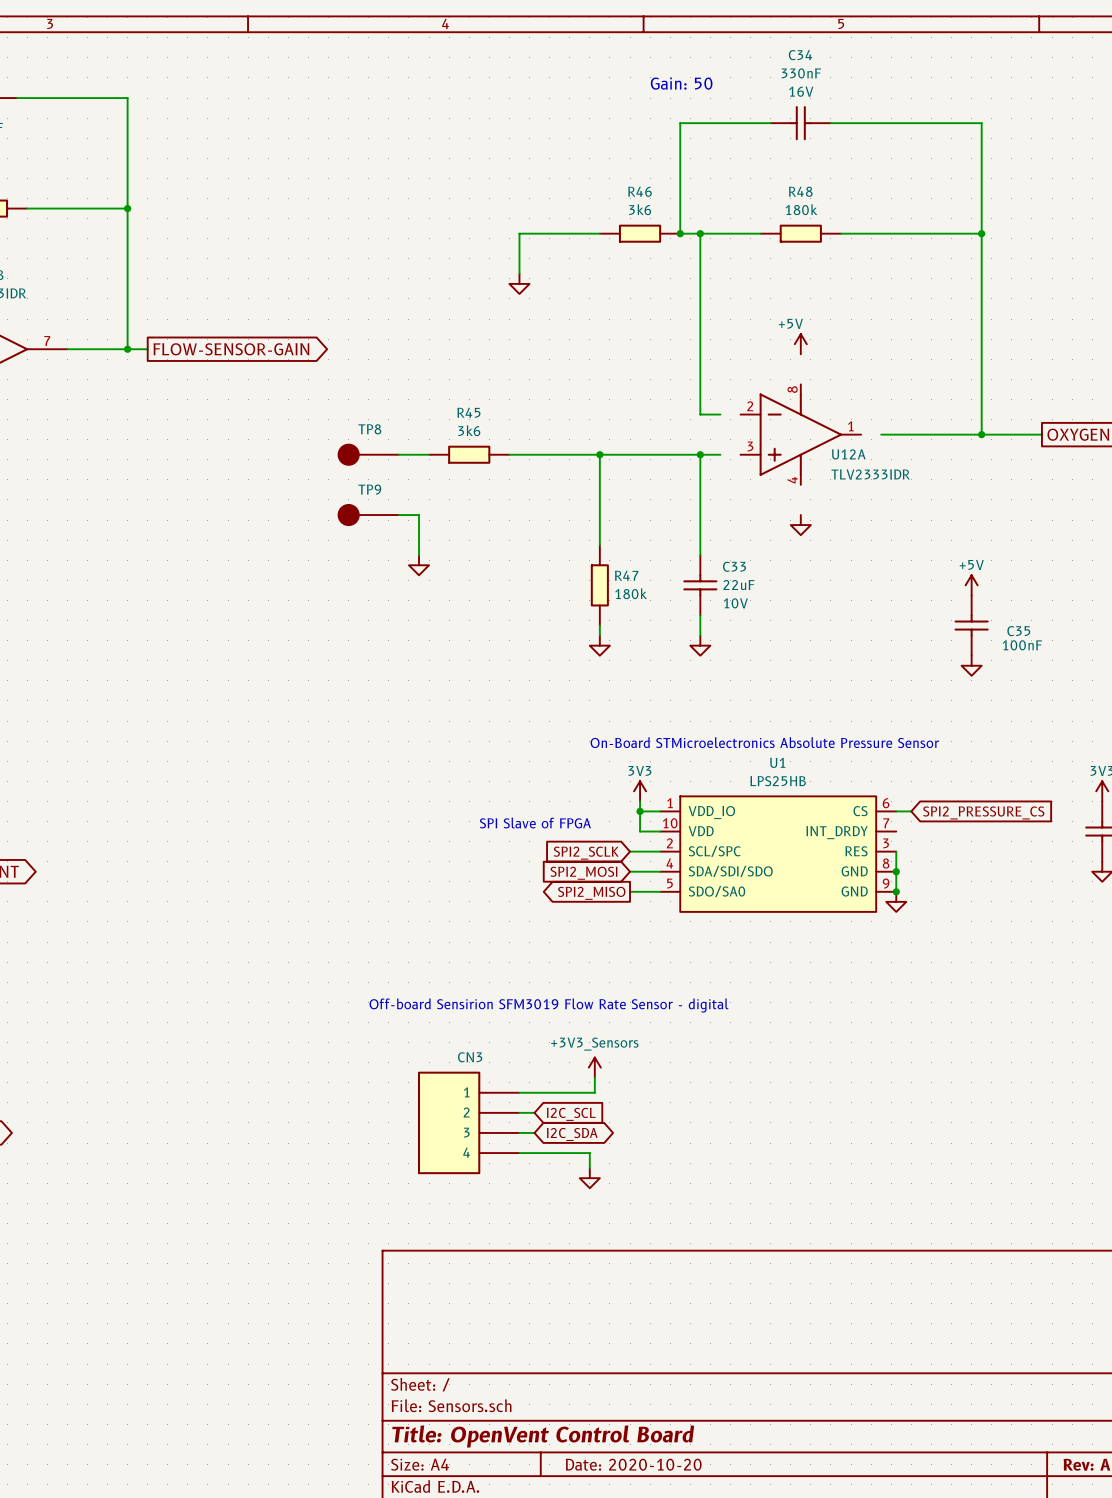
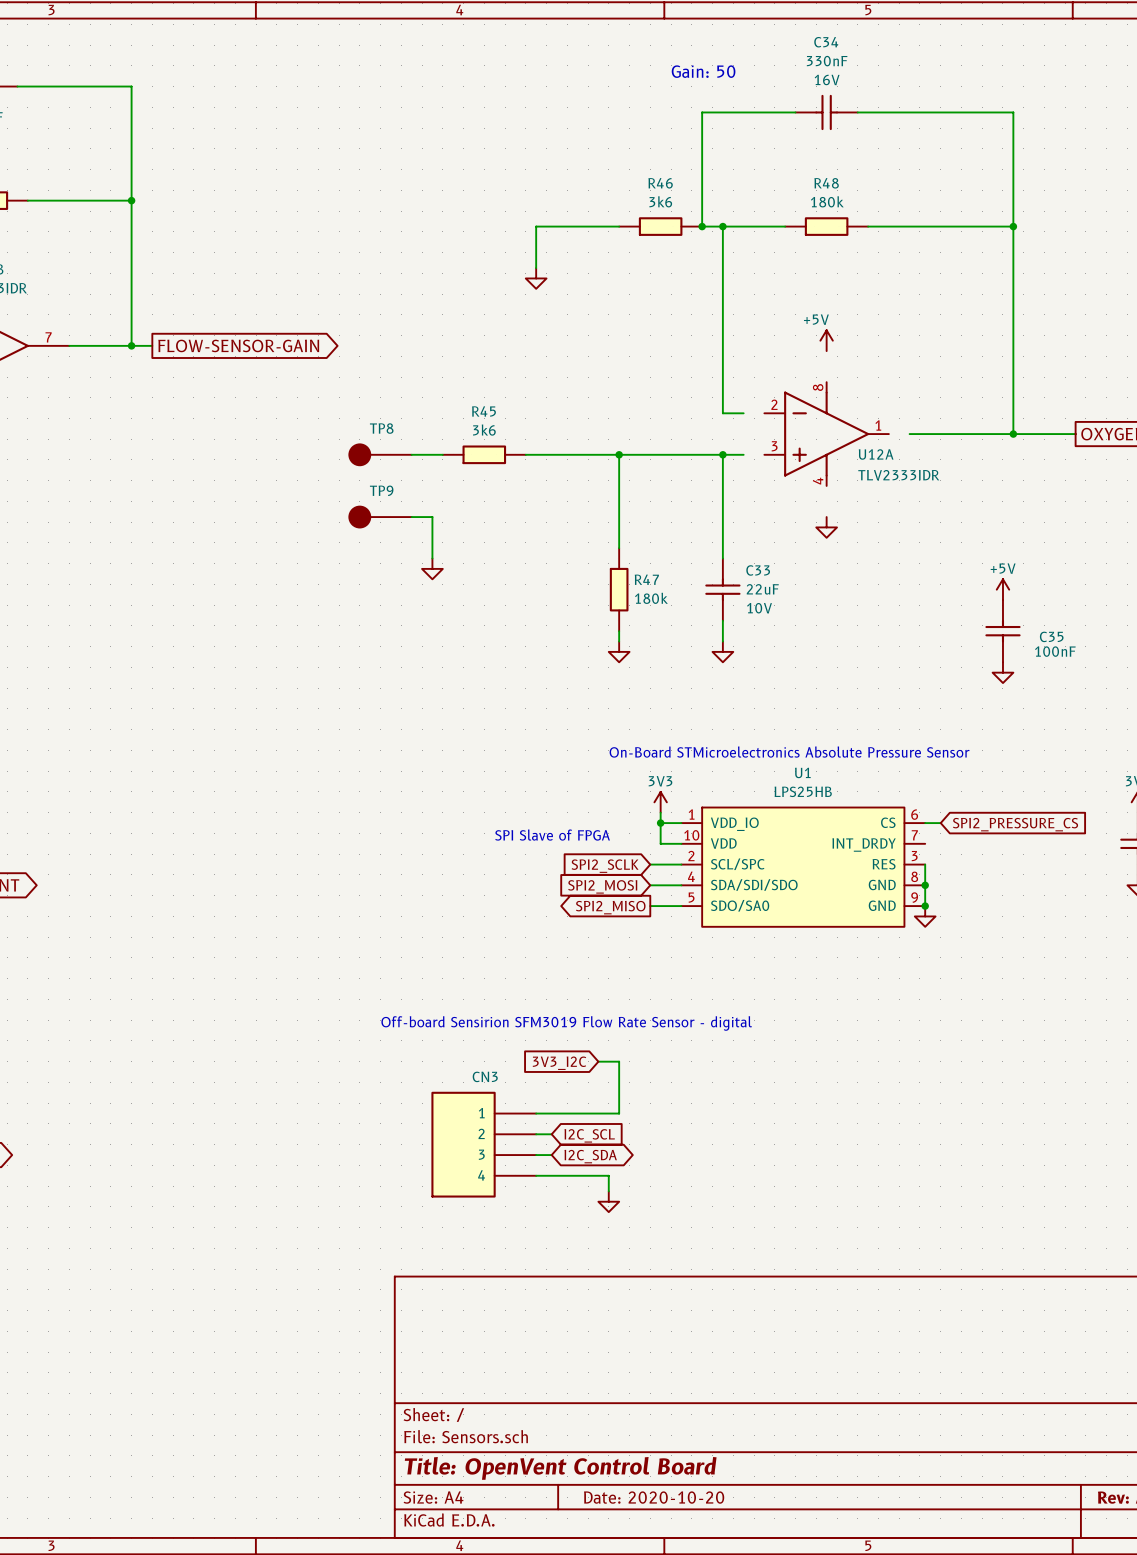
global label: none -> 3V3_I2C (559, 1063)
power symbol: +3V3_Sensors (594, 1067) -> none
wire: (594, 1077) (594, 1092) -> (598, 1061) (619, 1061) (619, 1113) (613, 1113)

